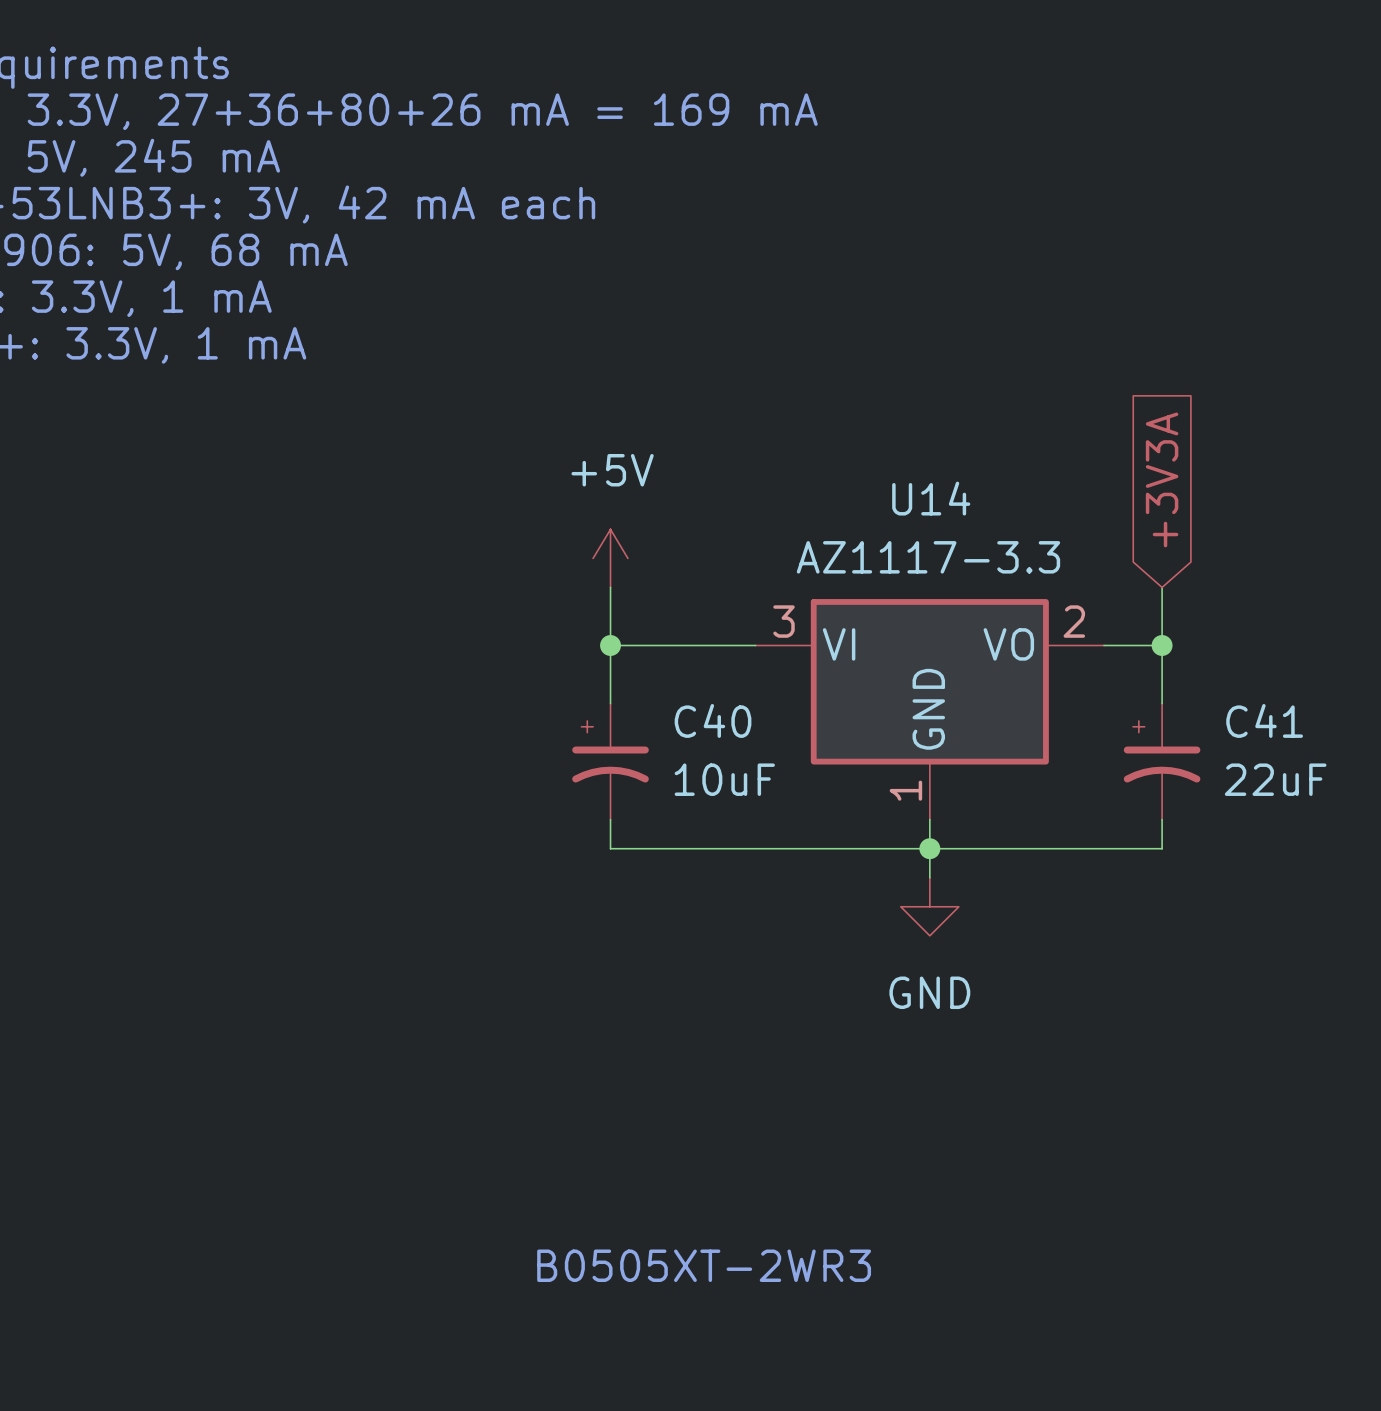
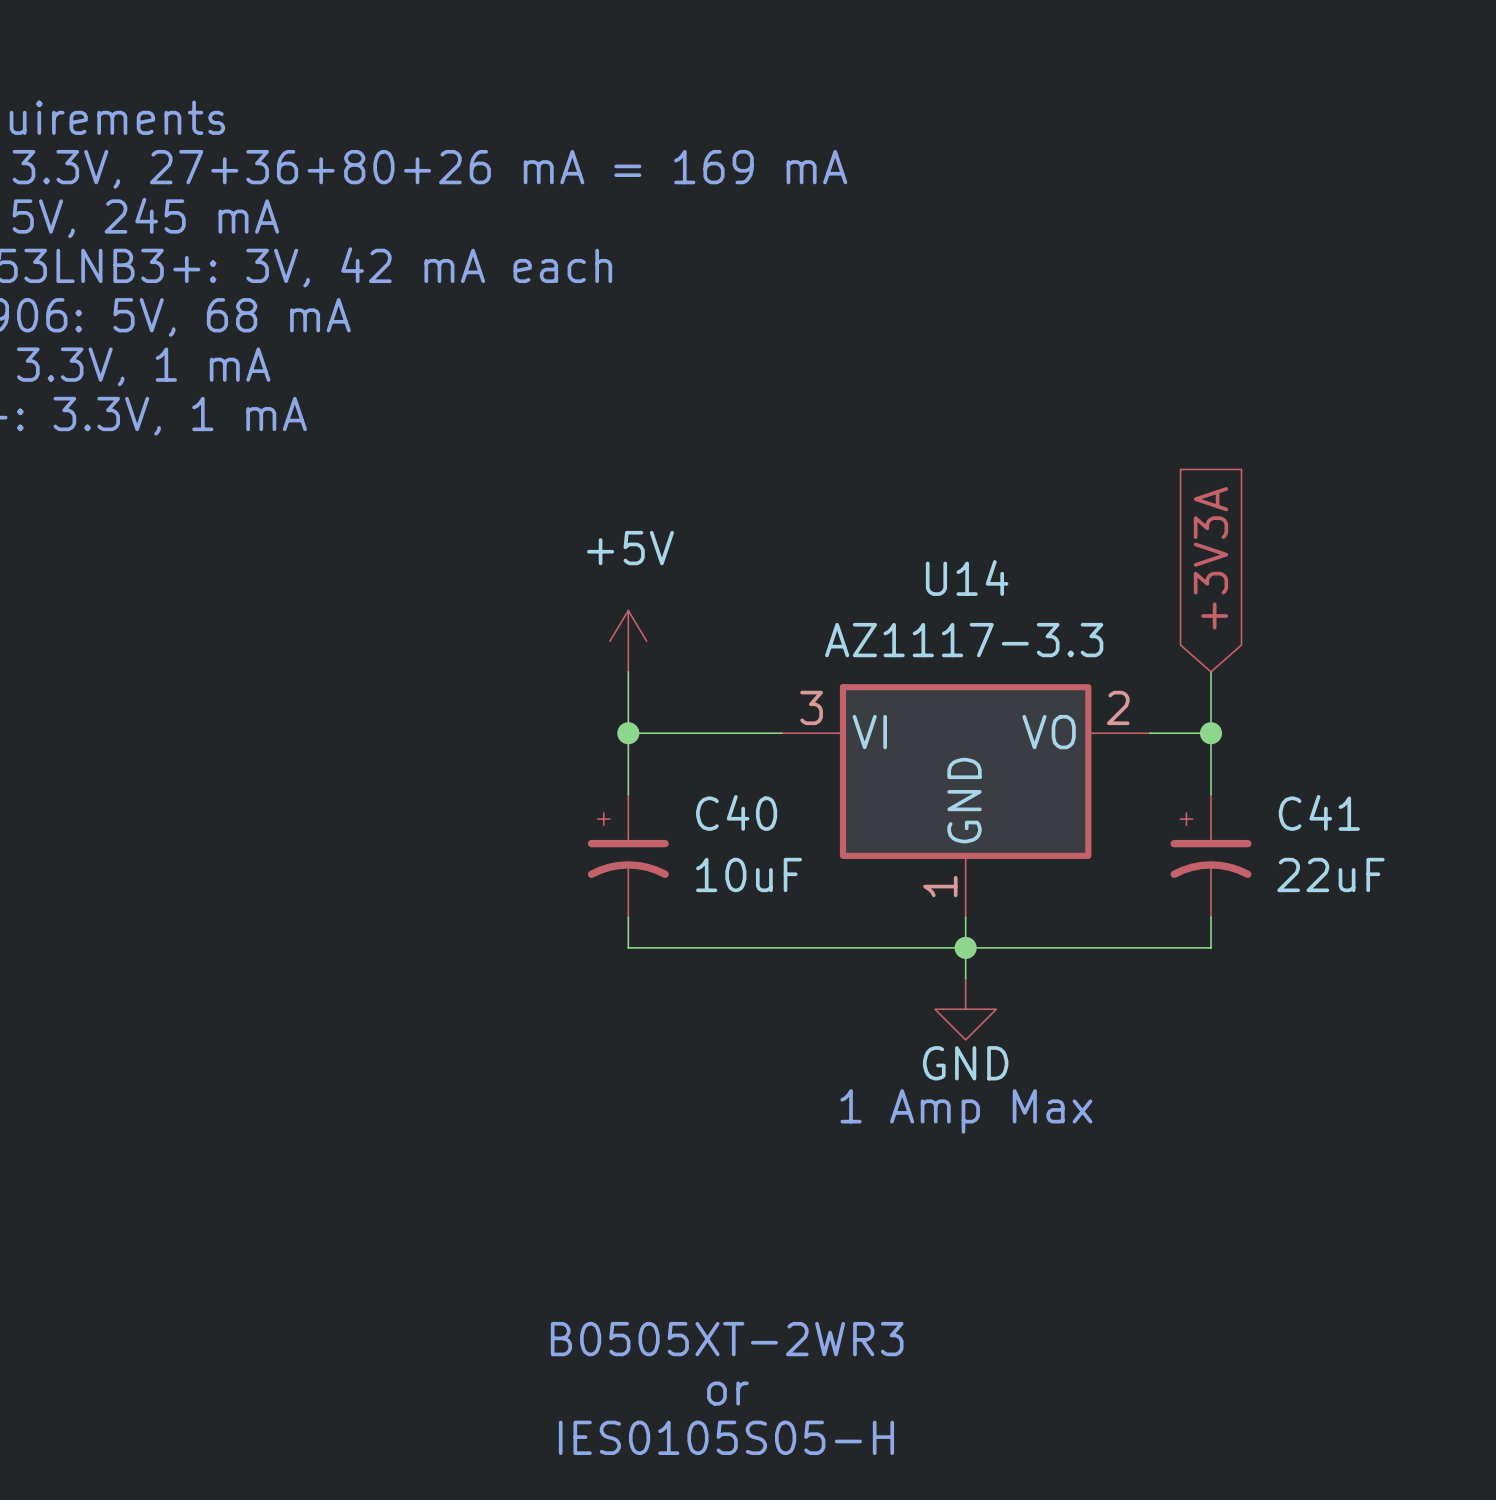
power symbol text position: GND (929, 992) -> GND (965, 1063)
text: none -> 1 Amp Max (966, 1111)
text: none -> B0505XT-2WR3 (727, 1339)
text: B0505XT-2WR3 (704, 1265) -> or (727, 1393)
text: none -> IES0105S05-H (726, 1437)

